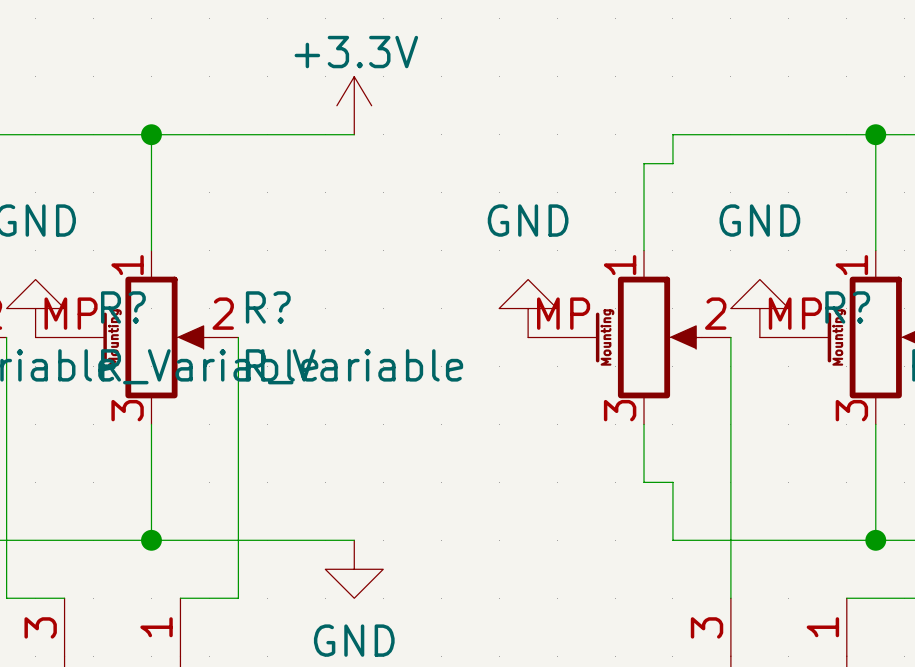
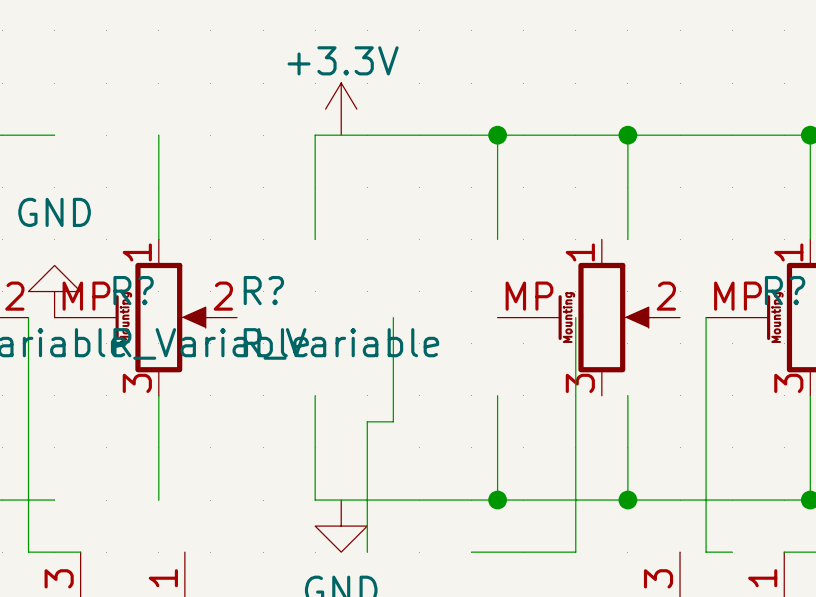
wire: (35, 134) (325, 134) -> (315, 239) (315, 135)
junction: (151, 134) -> none
wire: none -> (341, 135) (627, 135)
wire: none -> (497, 135) (497, 239)
junction: none -> (497, 135)
junction: none -> (627, 135)
wire: (672, 163) (644, 163) (644, 250) -> (627, 161) (627, 239)
power symbol: GND (528, 308) -> none
power symbol: GND (759, 308) -> none
wire: (238, 337) (238, 598) (180, 598) -> none
wire: none -> (393, 317) (393, 421) (367, 421) (367, 552)
wire: none -> (575, 317) (575, 552) (471, 552)
wire: (730, 337) (730, 598) -> none
wire: none -> (706, 317) (706, 552) (732, 552)
wire: none -> (497, 395) (497, 500)
wire: (644, 424) (644, 482) (672, 482) -> (627, 395) (627, 447)
wire: (35, 540) (325, 540) -> (315, 395) (315, 500)
junction: (151, 540) -> none
wire: none -> (341, 500) (627, 500)
junction: none -> (497, 500)
junction: none -> (627, 500)

